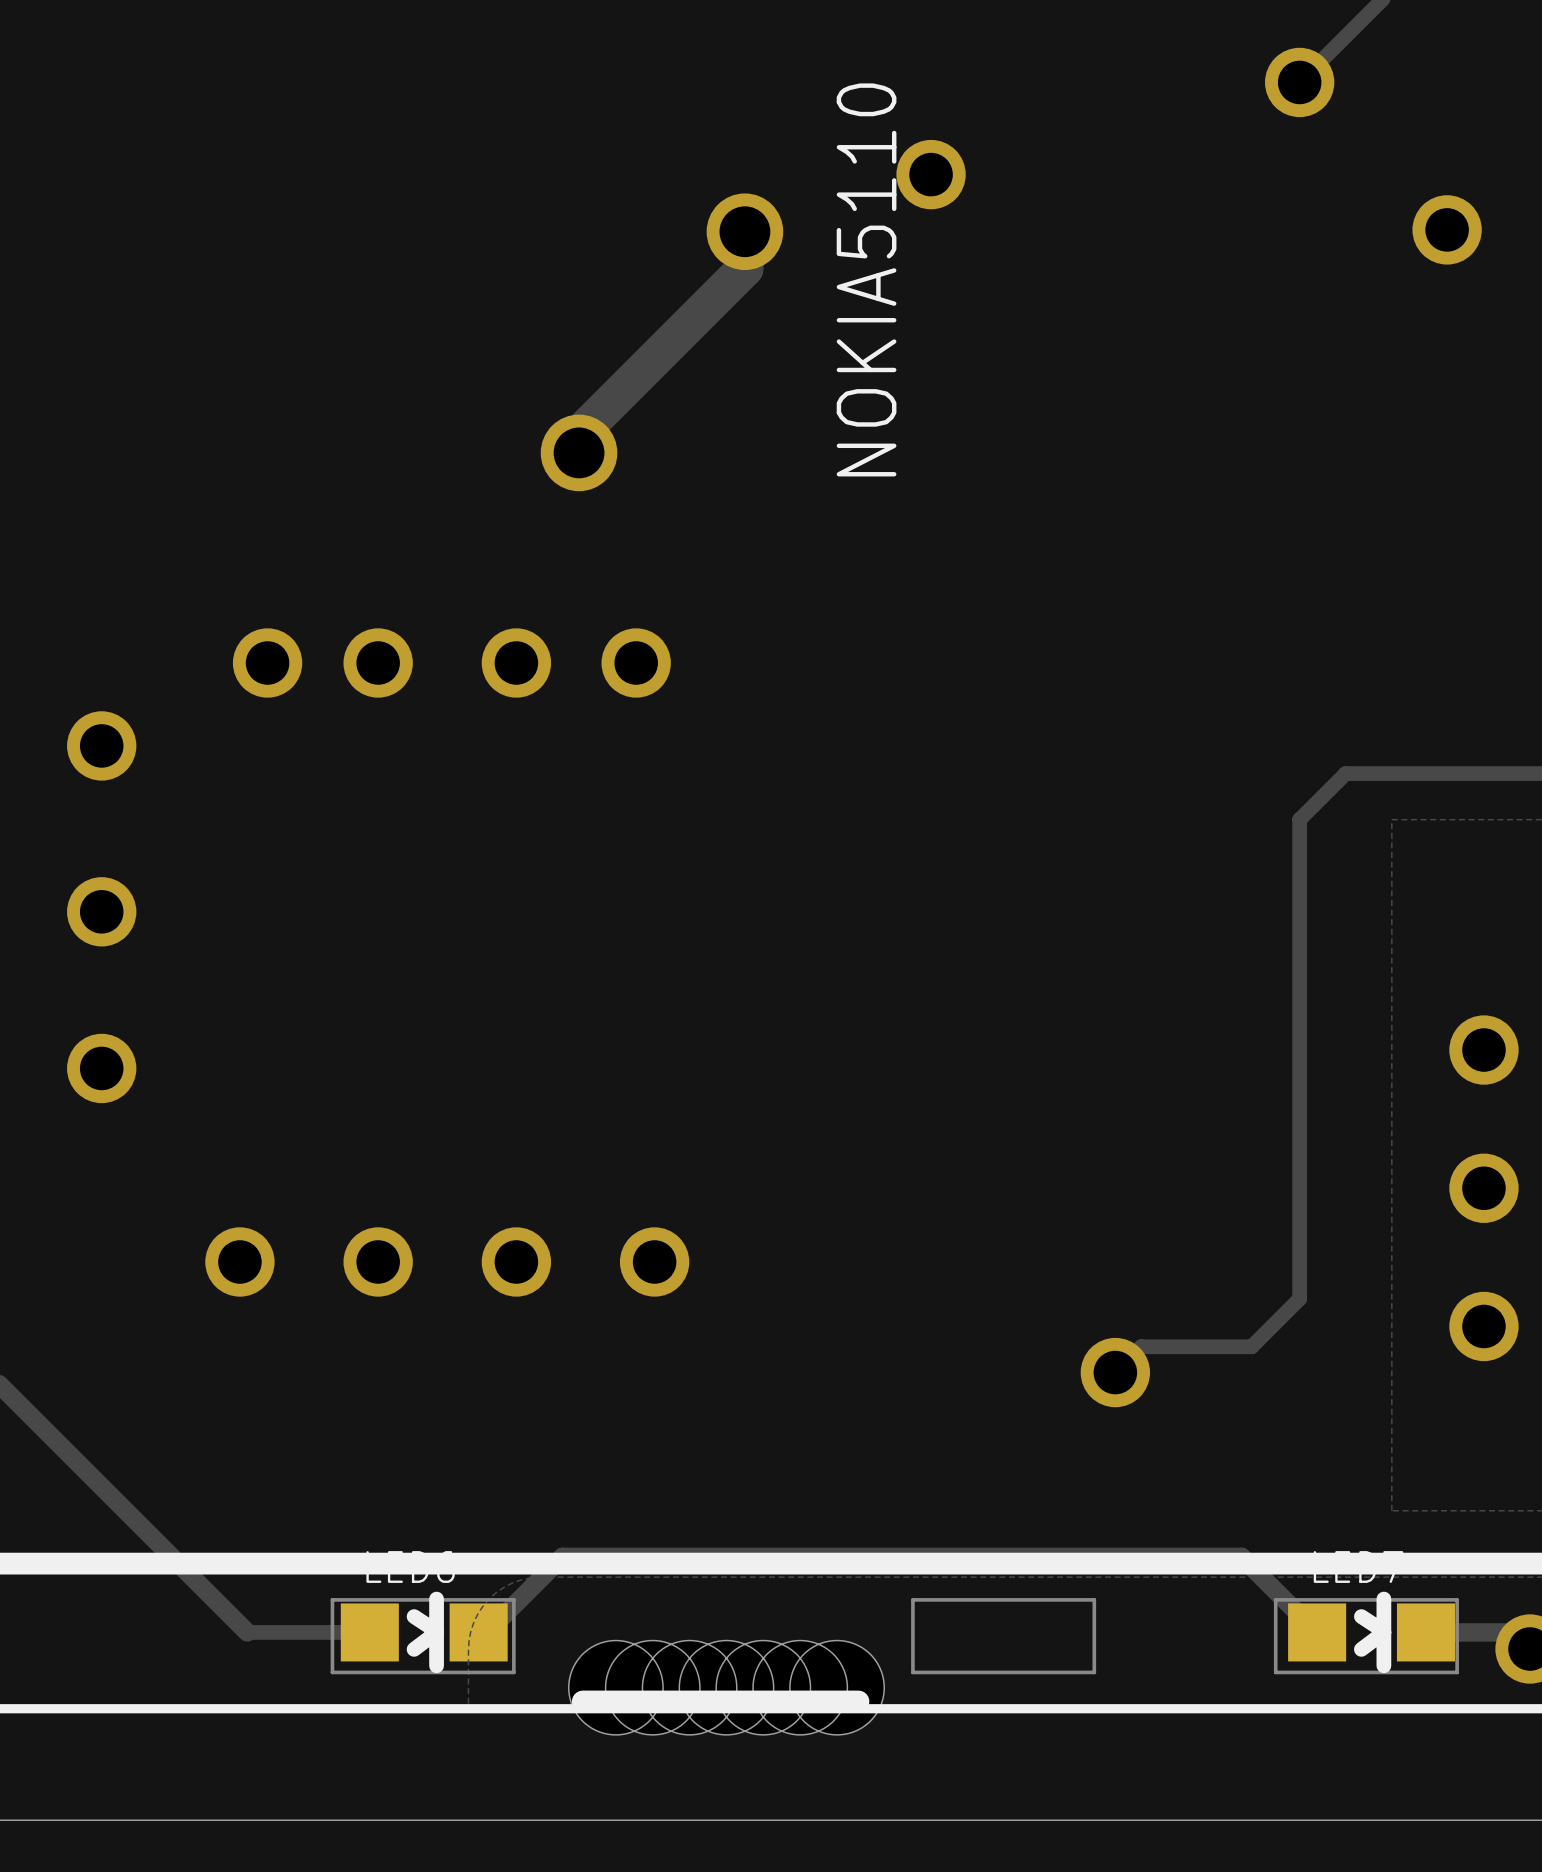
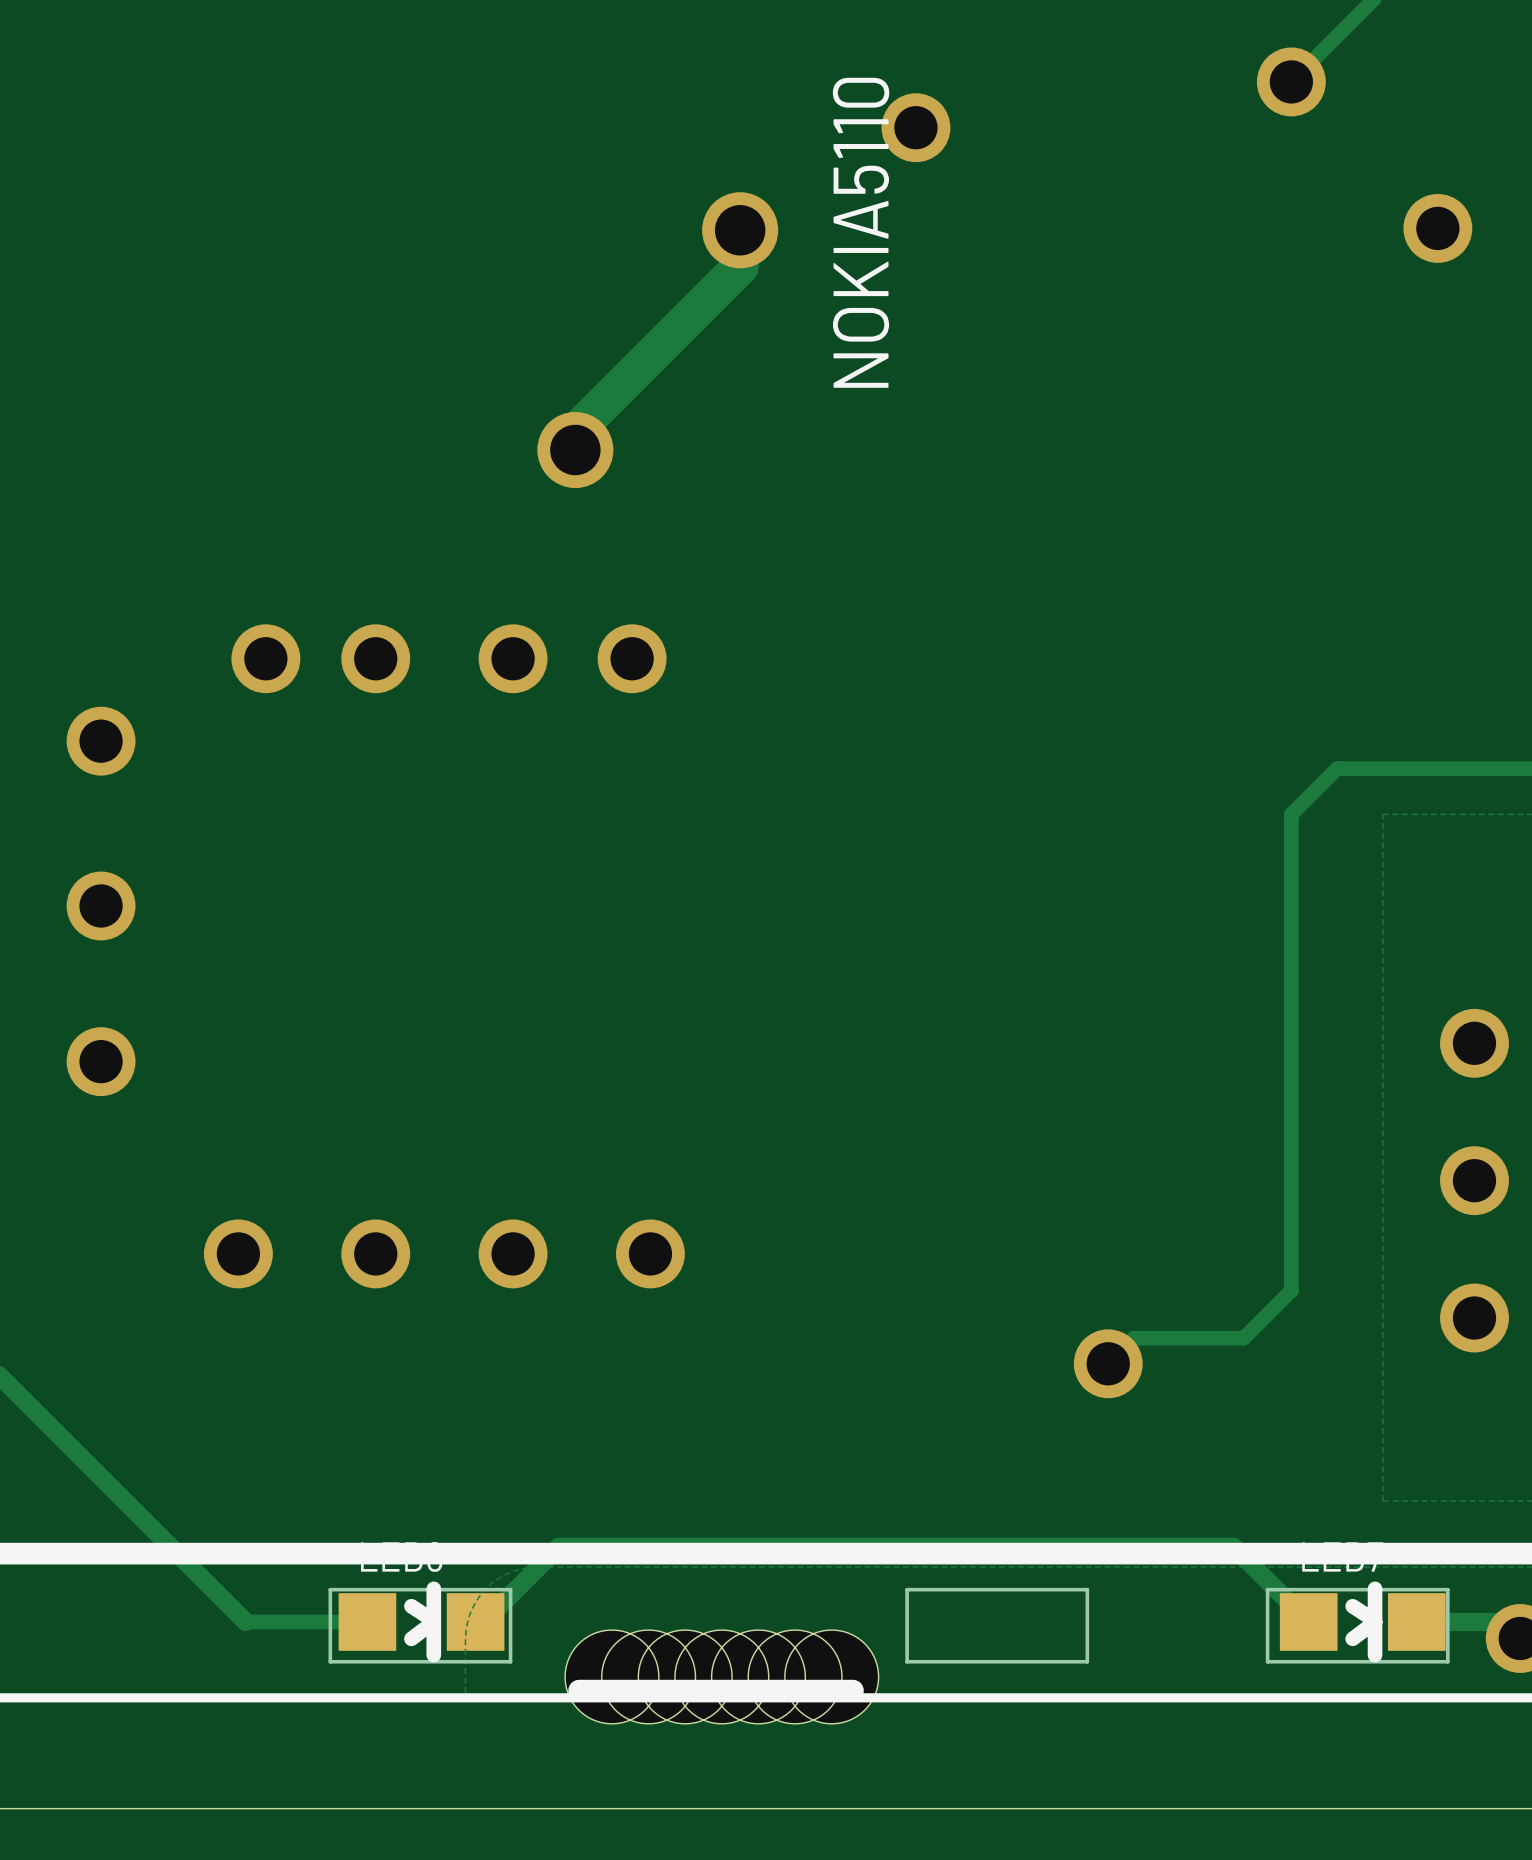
via position: (931, 174) -> (915, 127)

